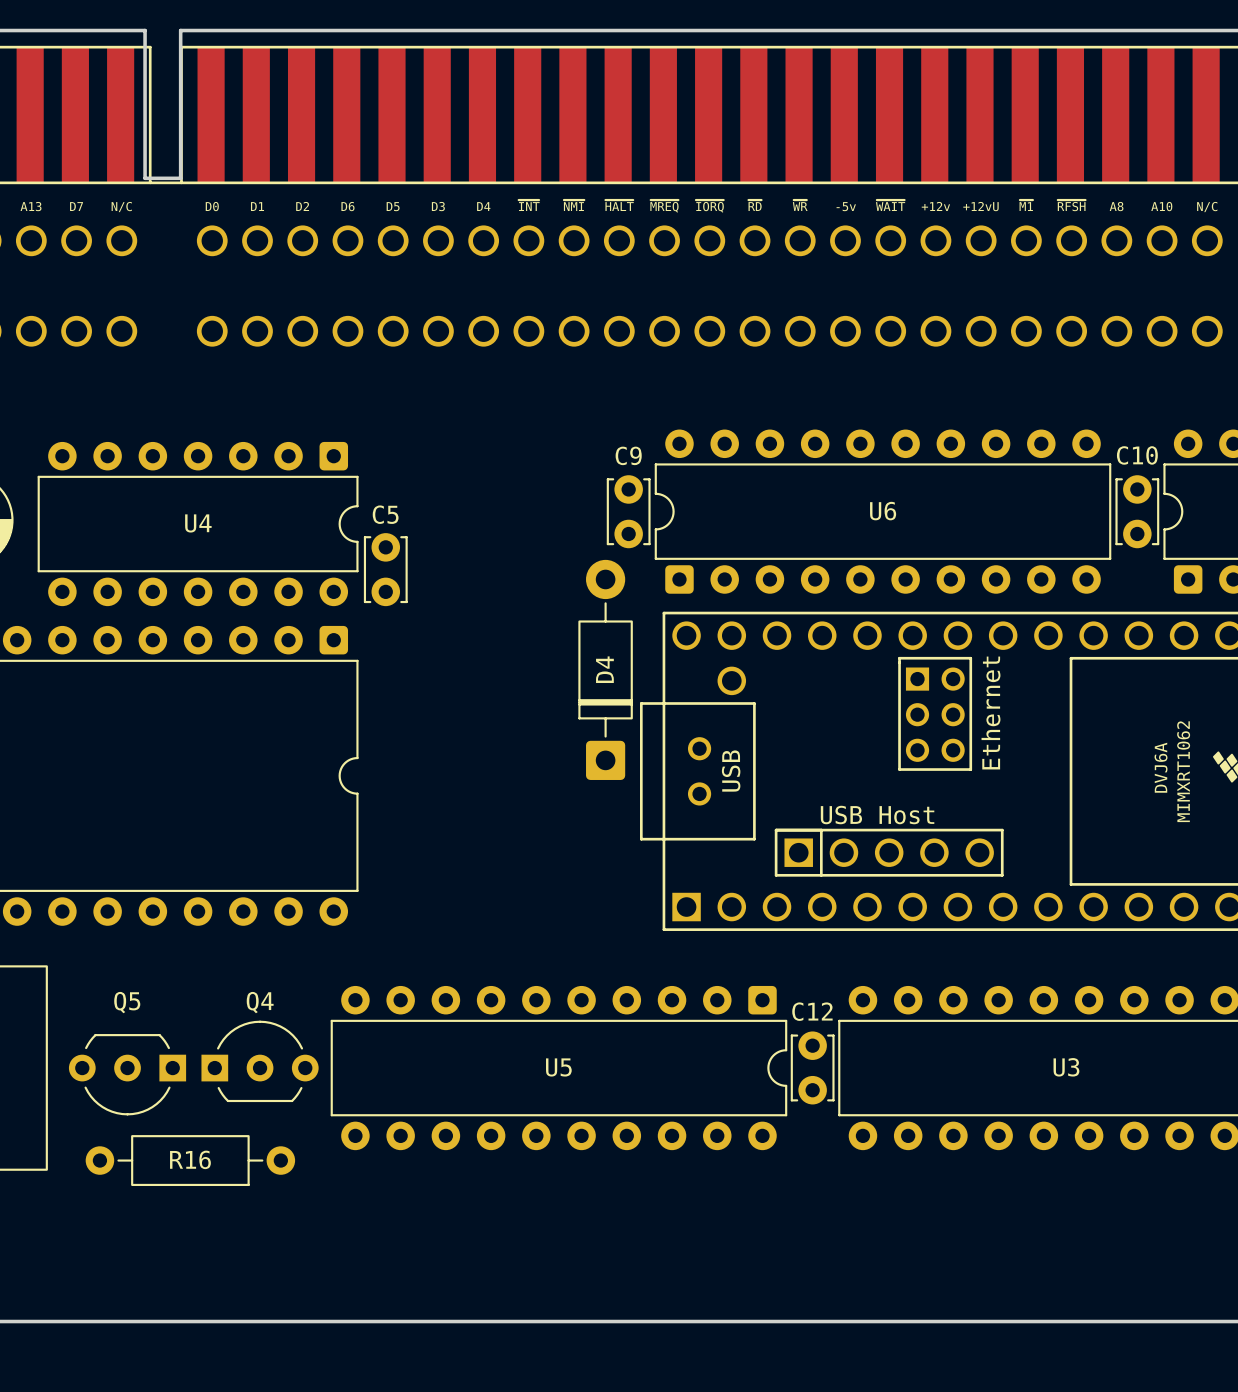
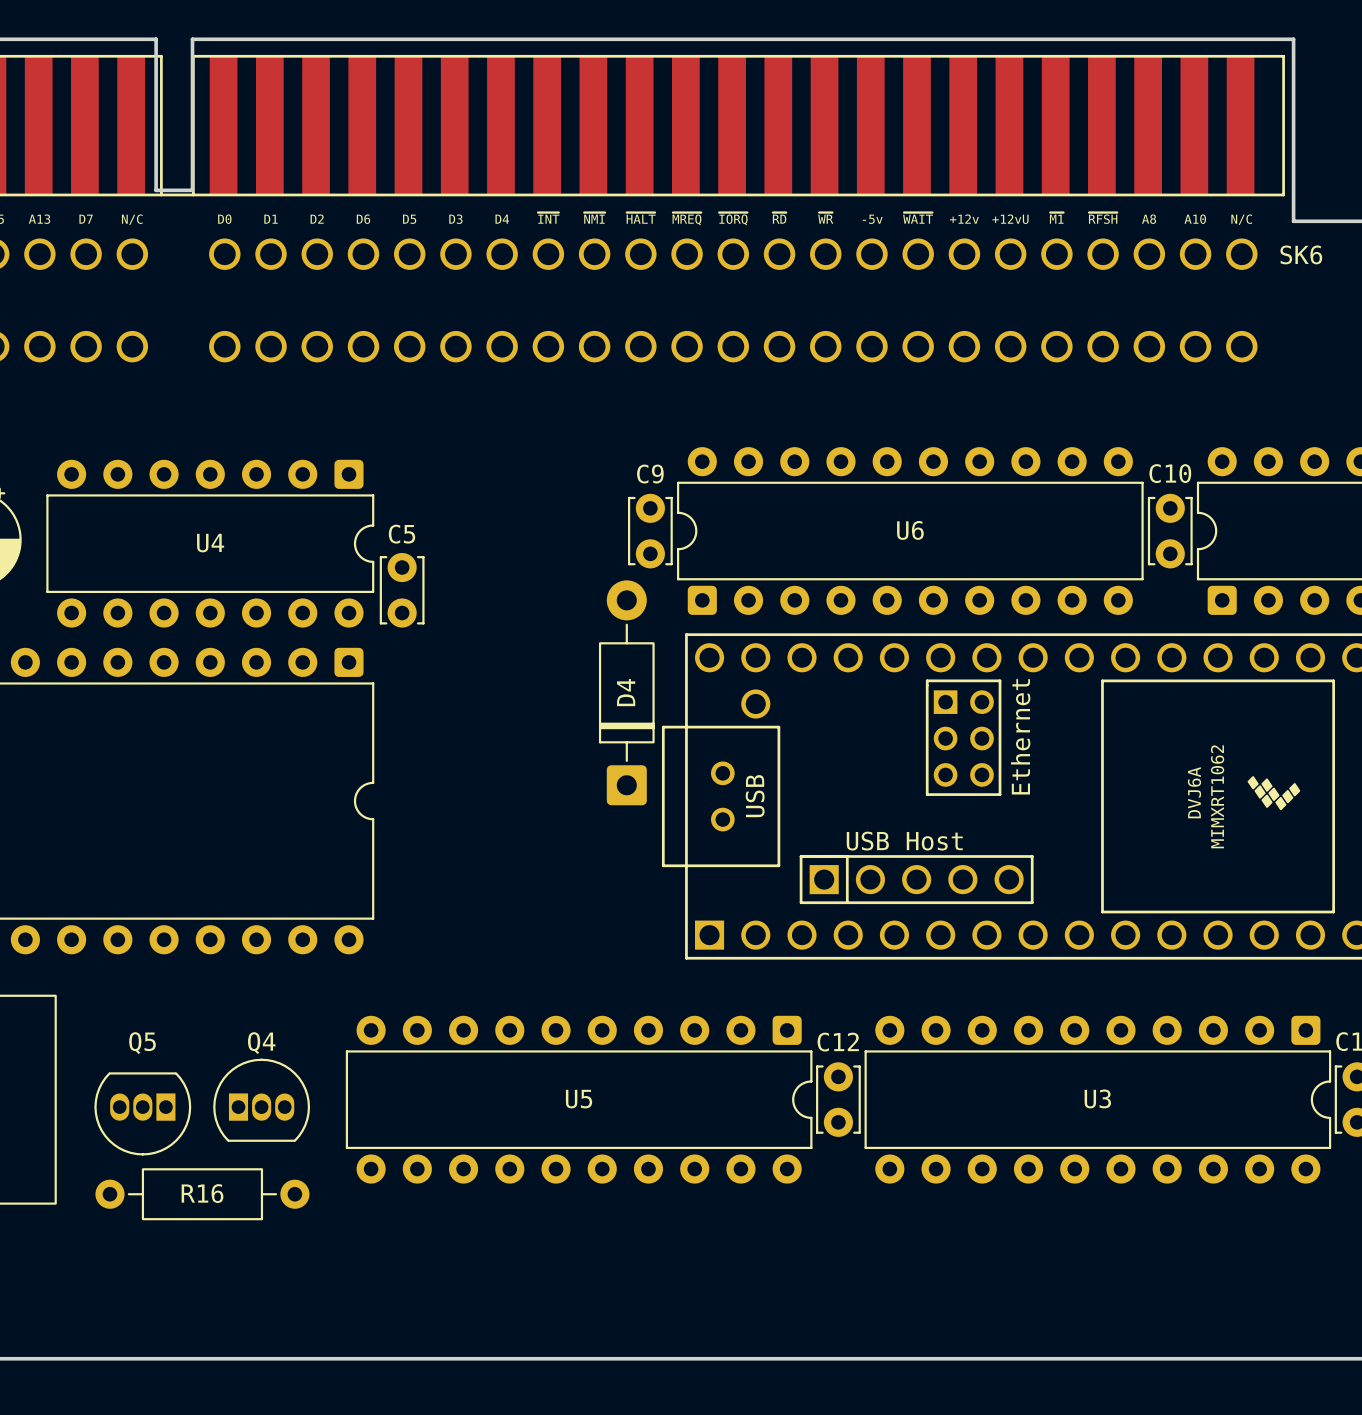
Q4 footprint: [201, 1020, 319, 1103] -> [213, 1058, 311, 1142]
Q5 footprint: [68, 1034, 187, 1116] -> [94, 1072, 192, 1156]

